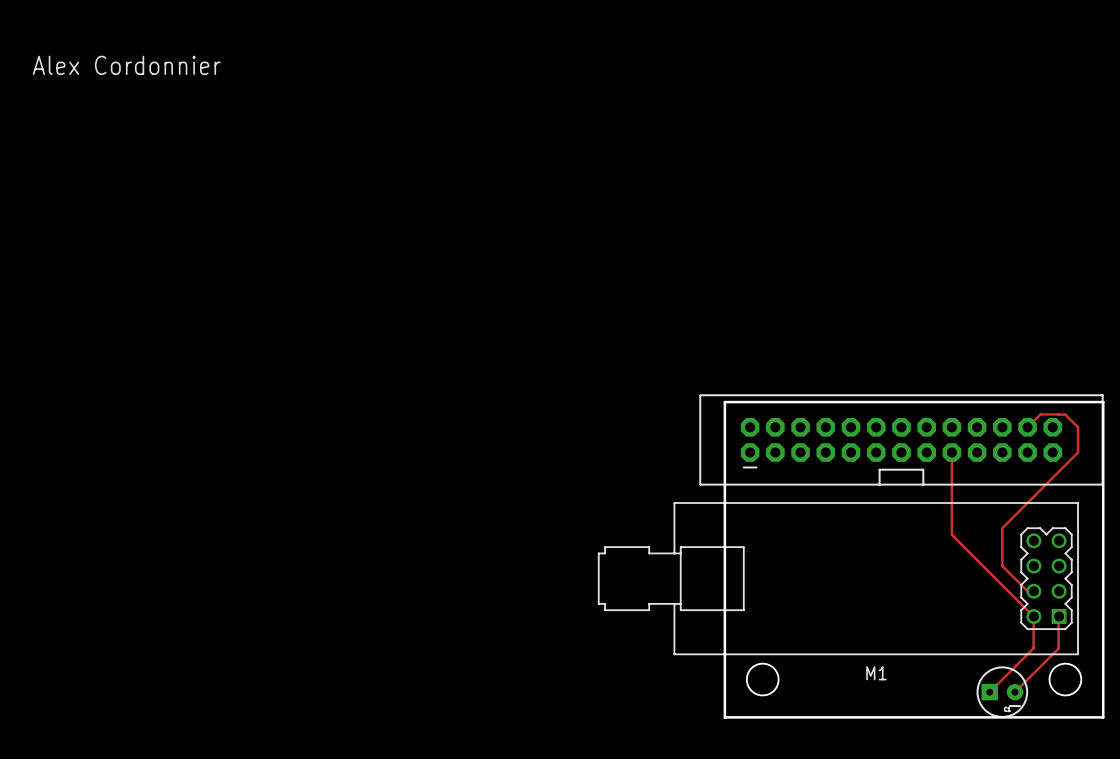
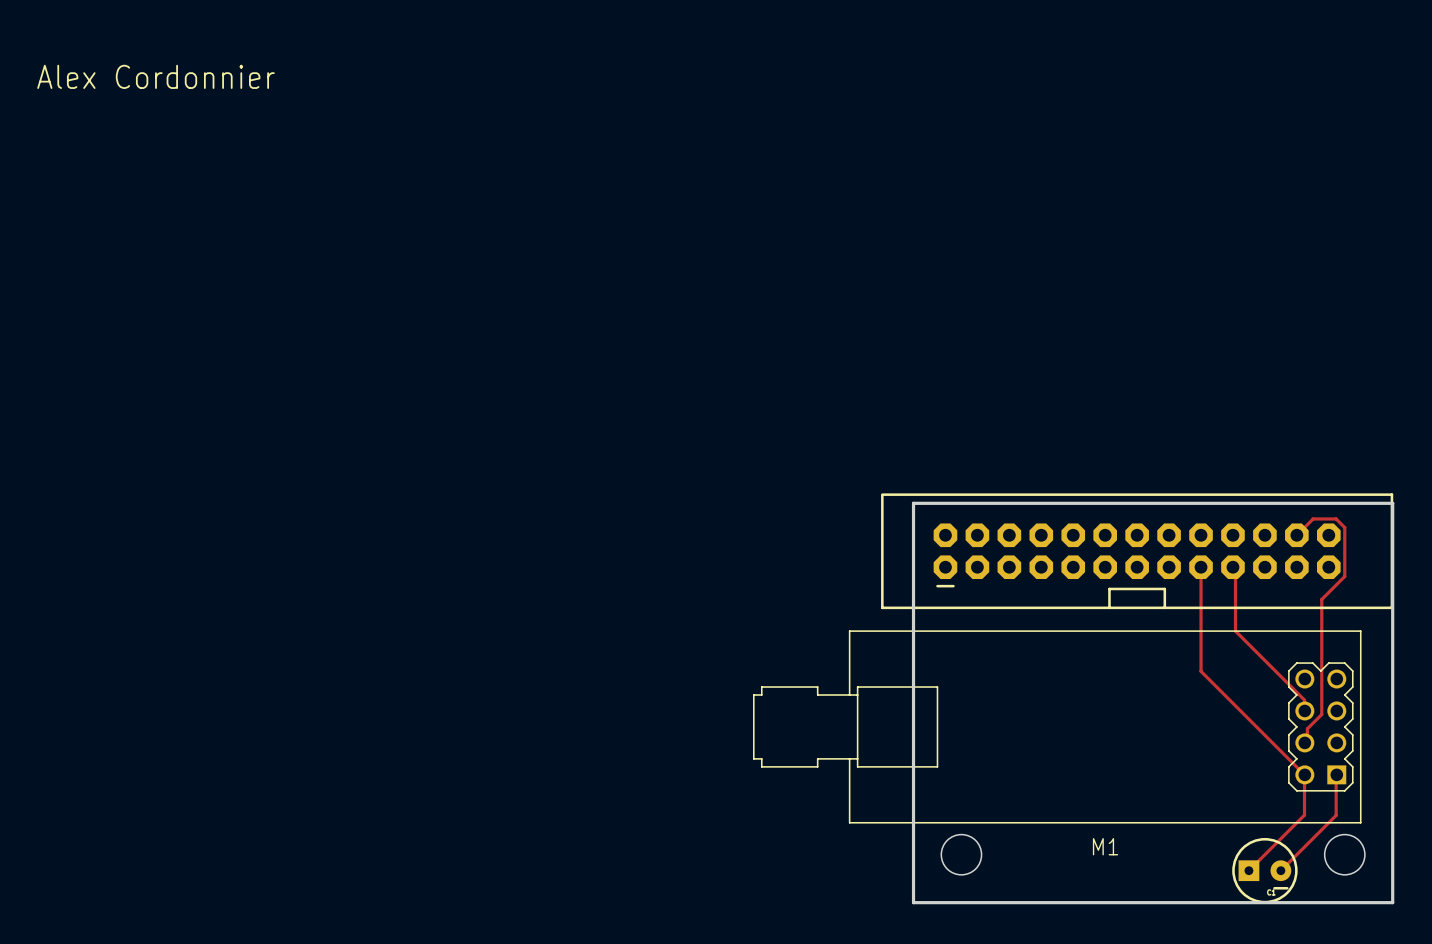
track: (1058, 414) (1065, 414) (1078, 427) (1078, 452) (1002, 528) (1002, 566) (1027, 591) (1033, 591) -> (1336, 519) (1344, 527) (1344, 576) (1321, 599) (1321, 714) (1307, 728) (1307, 740) (1304, 742)
track: none -> (1235, 567) (1235, 631) (1304, 700) (1304, 710)

